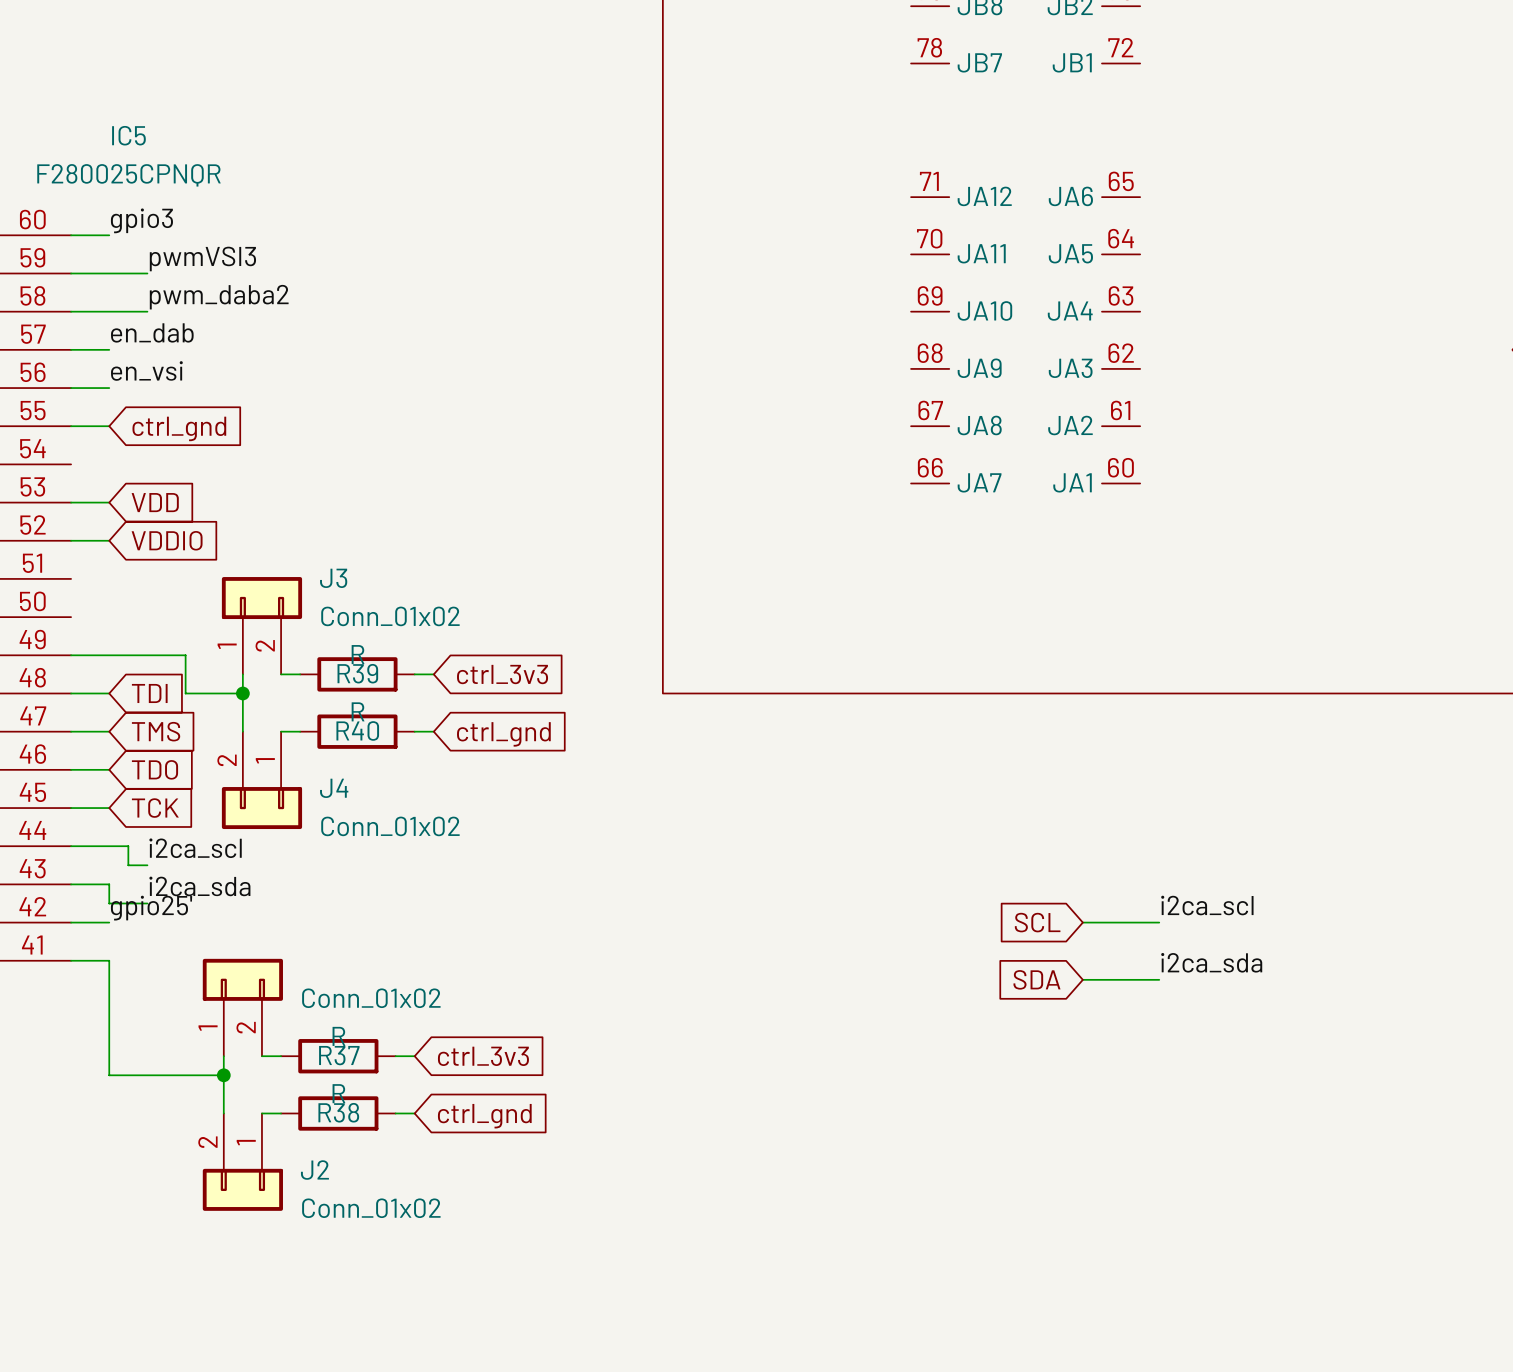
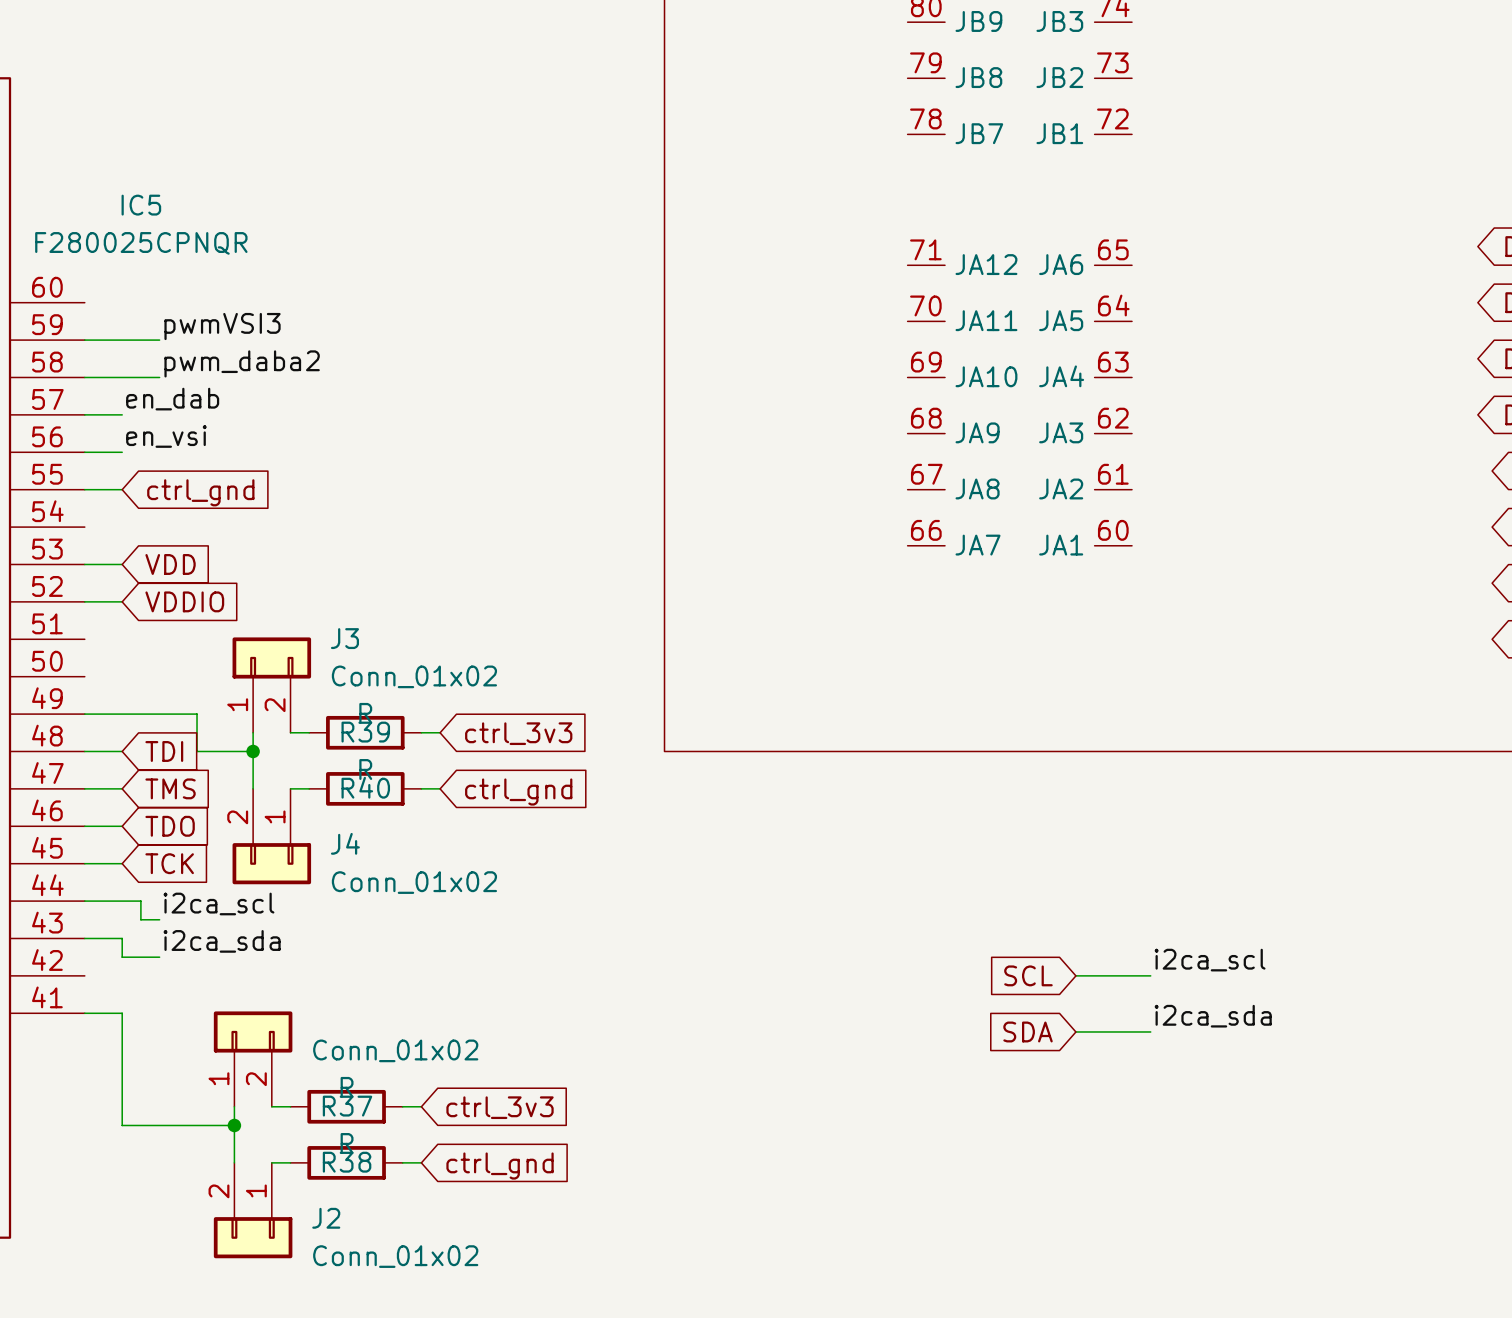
label: gpio3 (141, 220) -> none
wire: (71, 235) (109, 235) -> none
label: gpio25' (151, 908) -> none
wire: (71, 922) (109, 922) -> none

